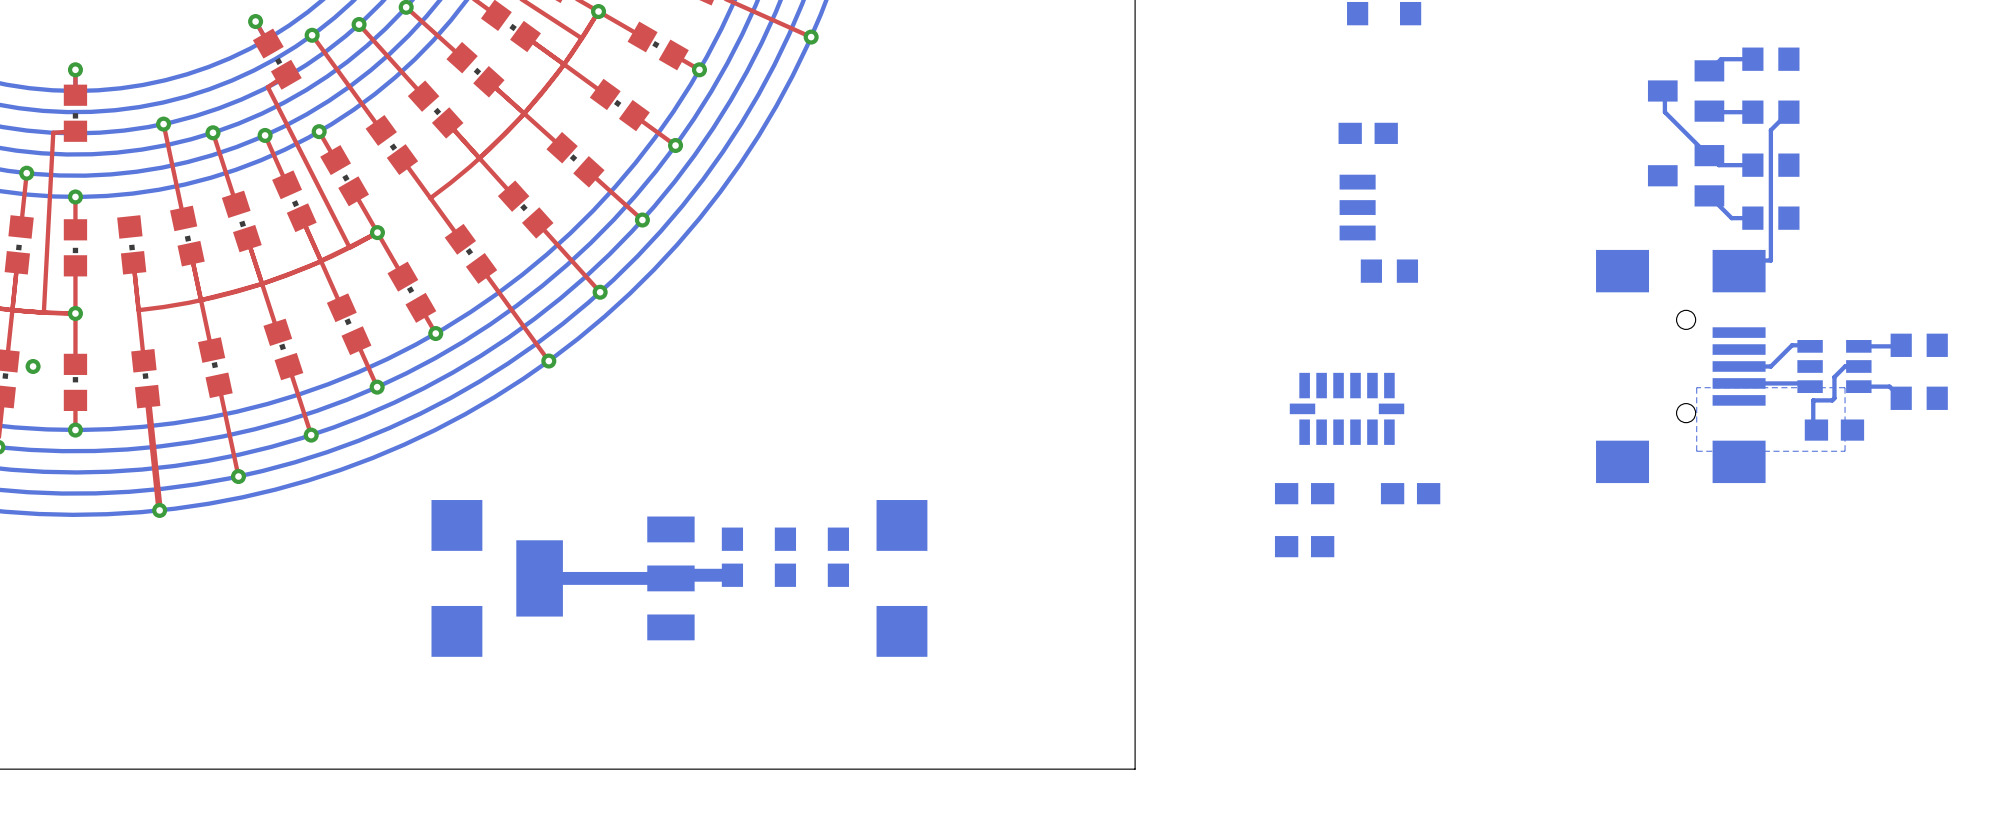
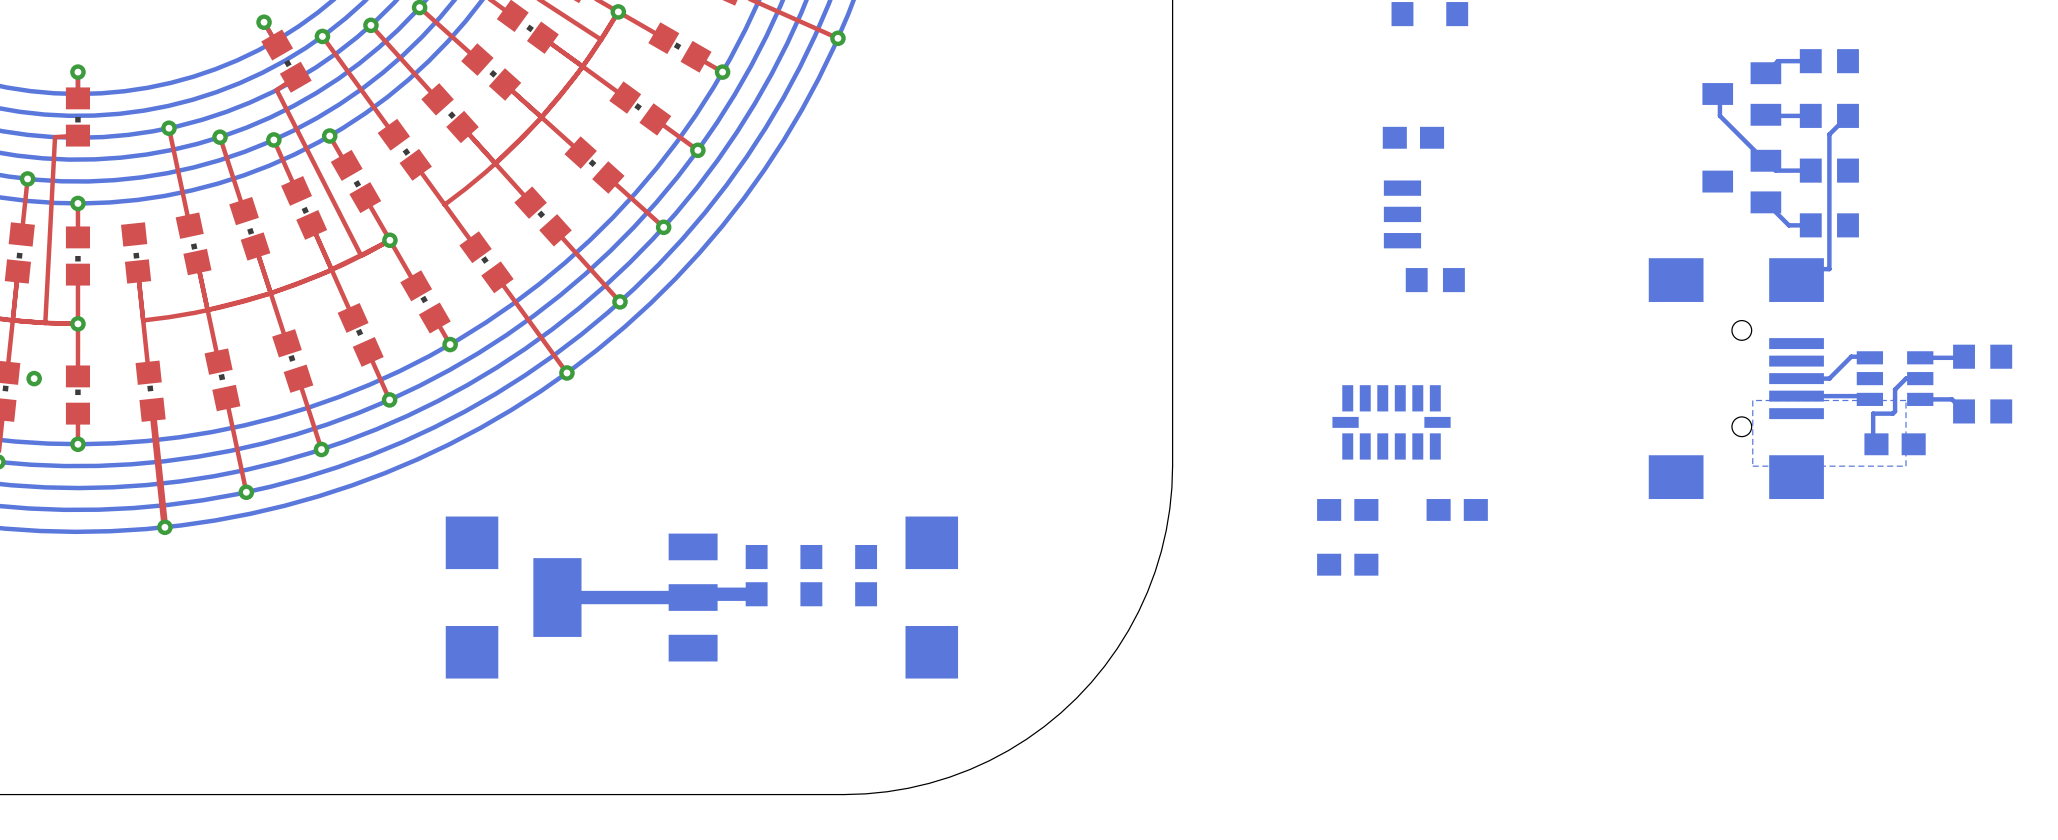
board edge: (1135, 451) (1135, 769) (817, 769) -> (1172, 466) (1166, 530) (1147, 591) (1117, 648) (1076, 698) (1026, 739) (969, 769) (908, 788) (844, 794)

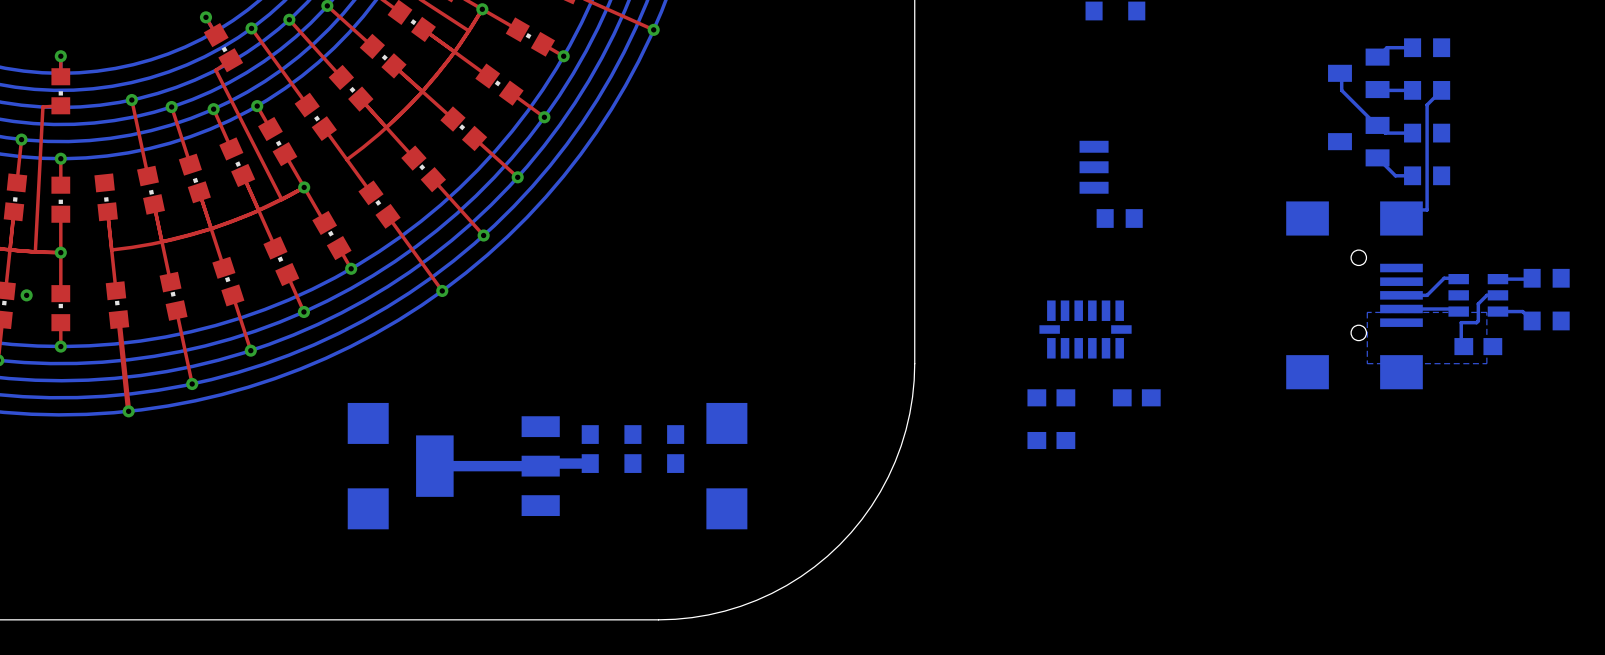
part: (1413, 137) -> none

